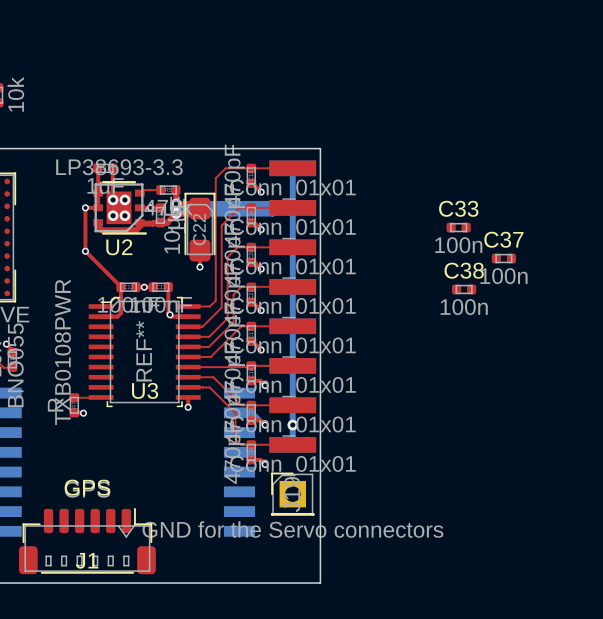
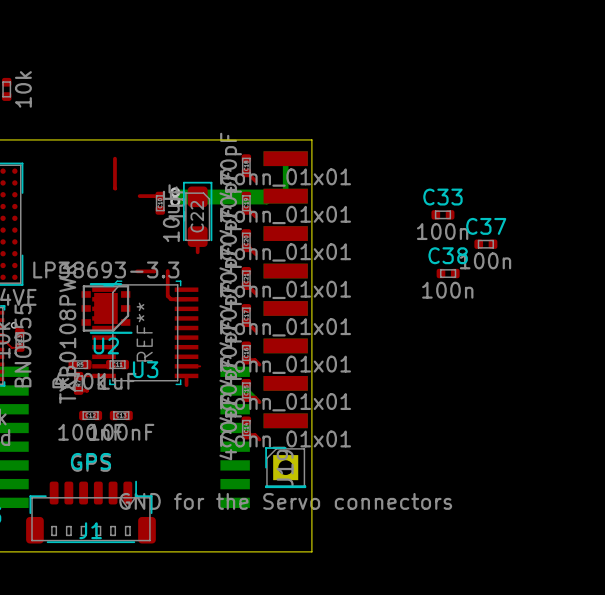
top track: (97, 168) (97, 207) -> none
part position: (105, 168) -> (117, 364)
top track: (292, 168) (225, 168) (215, 178) (215, 300) (209, 306) (188, 306) -> none
top track: (160, 190) (142, 190) (138, 194) -> none
part position: (168, 190) -> (80, 364)
top track: (176, 190) (176, 203) (196, 203) (199, 207) (194, 213) (176, 213) (167, 222) (142, 223) (136, 230) (101, 230) (99, 223) -> none
via: (261, 192) -> none
via: (113, 199) -> none
via: (124, 199) -> none
via: (85, 207) -> none
top track: (98, 207) (85, 207) (85, 251) (120, 286) (120, 313) (117, 316) (101, 316) -> none
U2 position: (120, 207) -> (107, 308)
via: (150, 207) -> none
top track: (292, 207) (239, 207) (221, 225) (221, 307) (202, 326) (188, 326) -> none
bottom track: (292, 207) (292, 444) -> none
via: (113, 215) -> none
via: (124, 215) -> none
via: (261, 229) -> none
top track: (292, 247) (237, 247) (227, 257) (227, 318) (209, 336) (188, 336) -> none
via: (85, 251) -> none
via: (199, 267) -> none
via: (261, 269) -> none
top track: (292, 286) (241, 286) (233, 294) (233, 322) (208, 346) (188, 346) -> none
part position: (128, 287) -> (90, 415)
via: (144, 287) -> none
part position: (160, 287) -> (121, 415)
via: (261, 310) -> none
via: (170, 314) -> none
top track: (292, 326) (241, 326) (210, 357) (188, 357) -> none
via: (261, 350) -> none
top track: (292, 365) (188, 367) -> none
top track: (188, 377) (213, 377) (241, 405) (292, 405) -> none
via: (265, 385) -> none
top track: (202, 387) (209, 387) (235, 413) (235, 438) (241, 444) (292, 444) -> none
via: (188, 407) -> none
via: (83, 413) -> none
via: (265, 425) -> none
via: (292, 425) -> none
via: (265, 464) -> none

